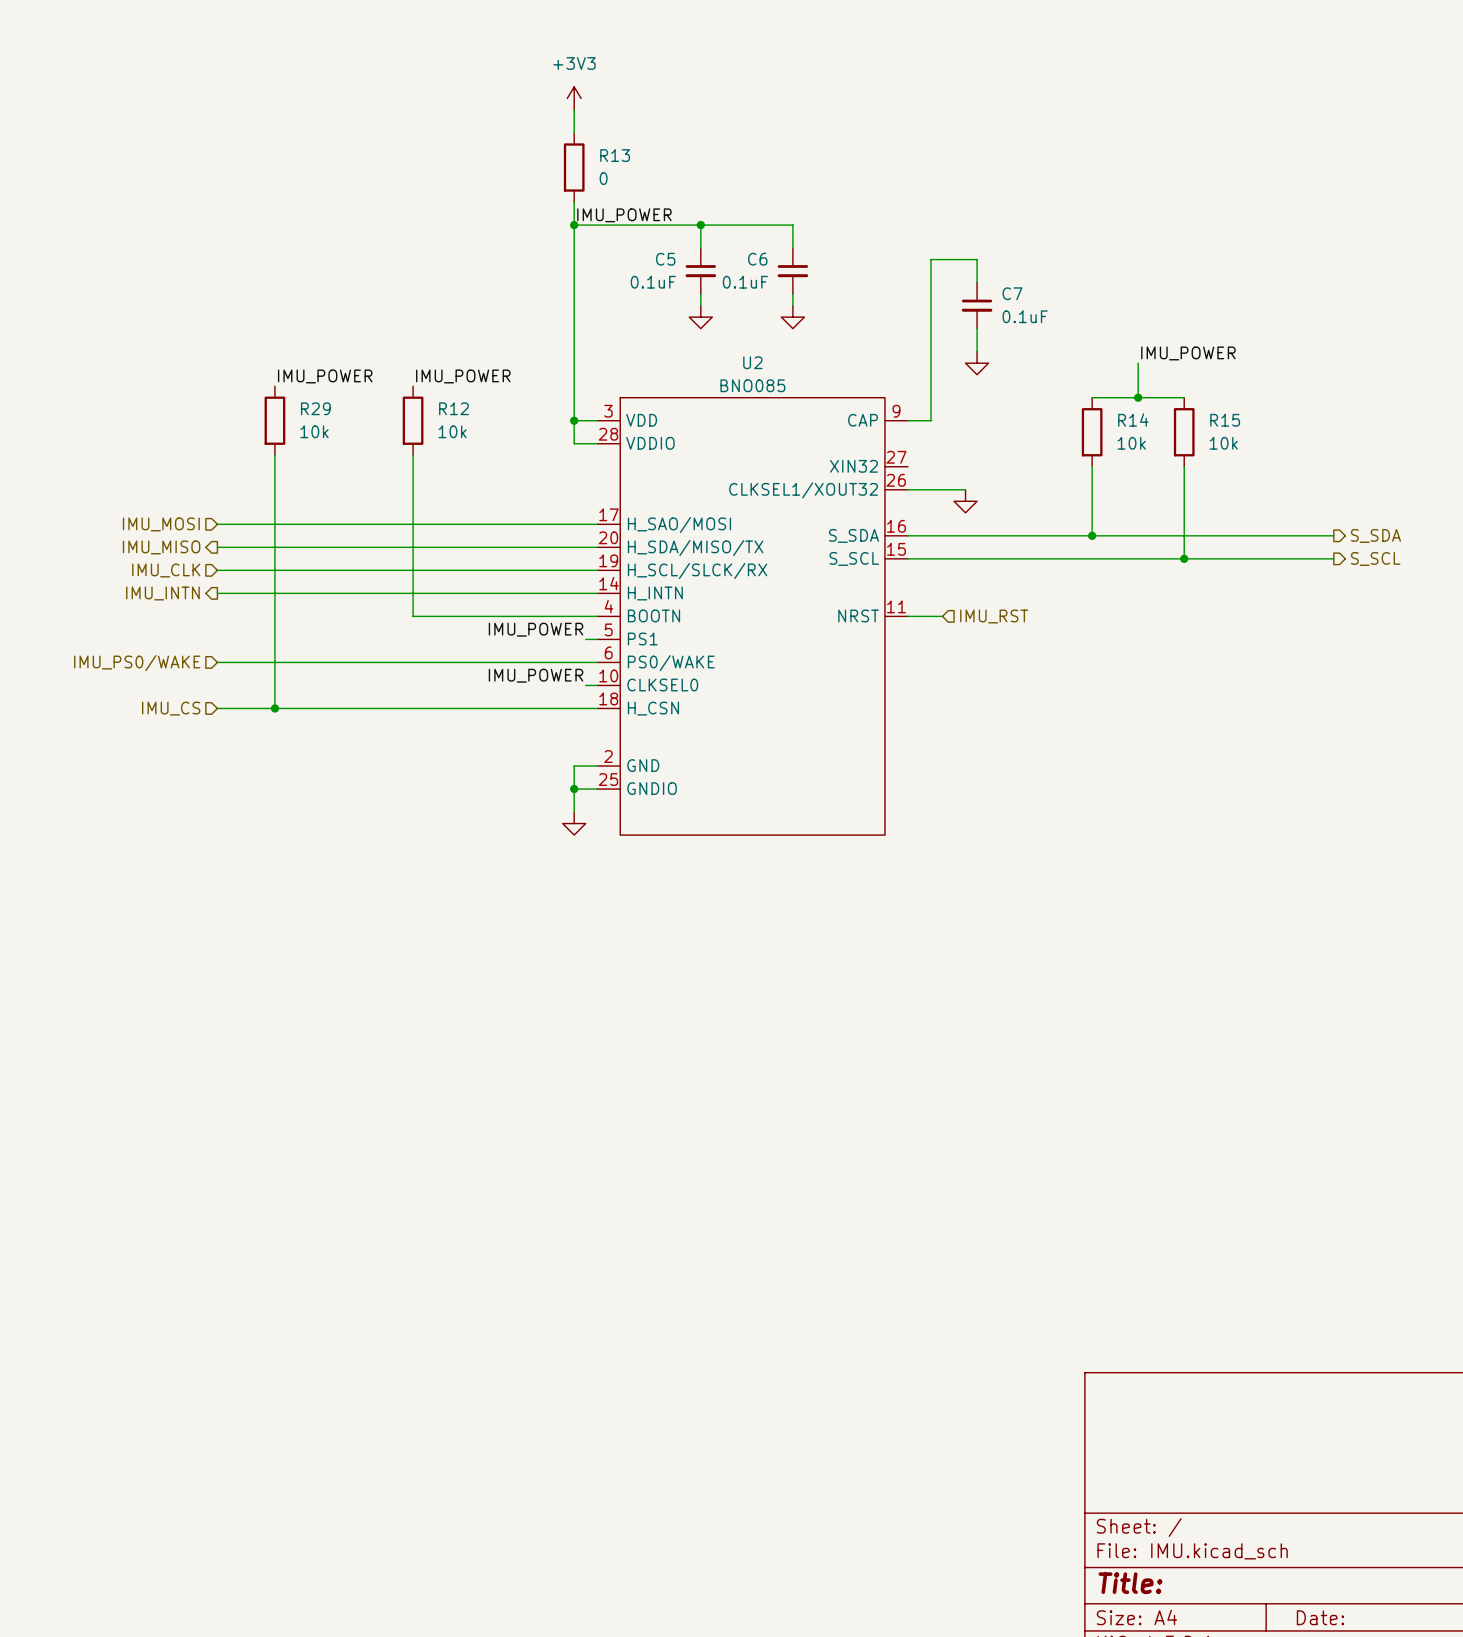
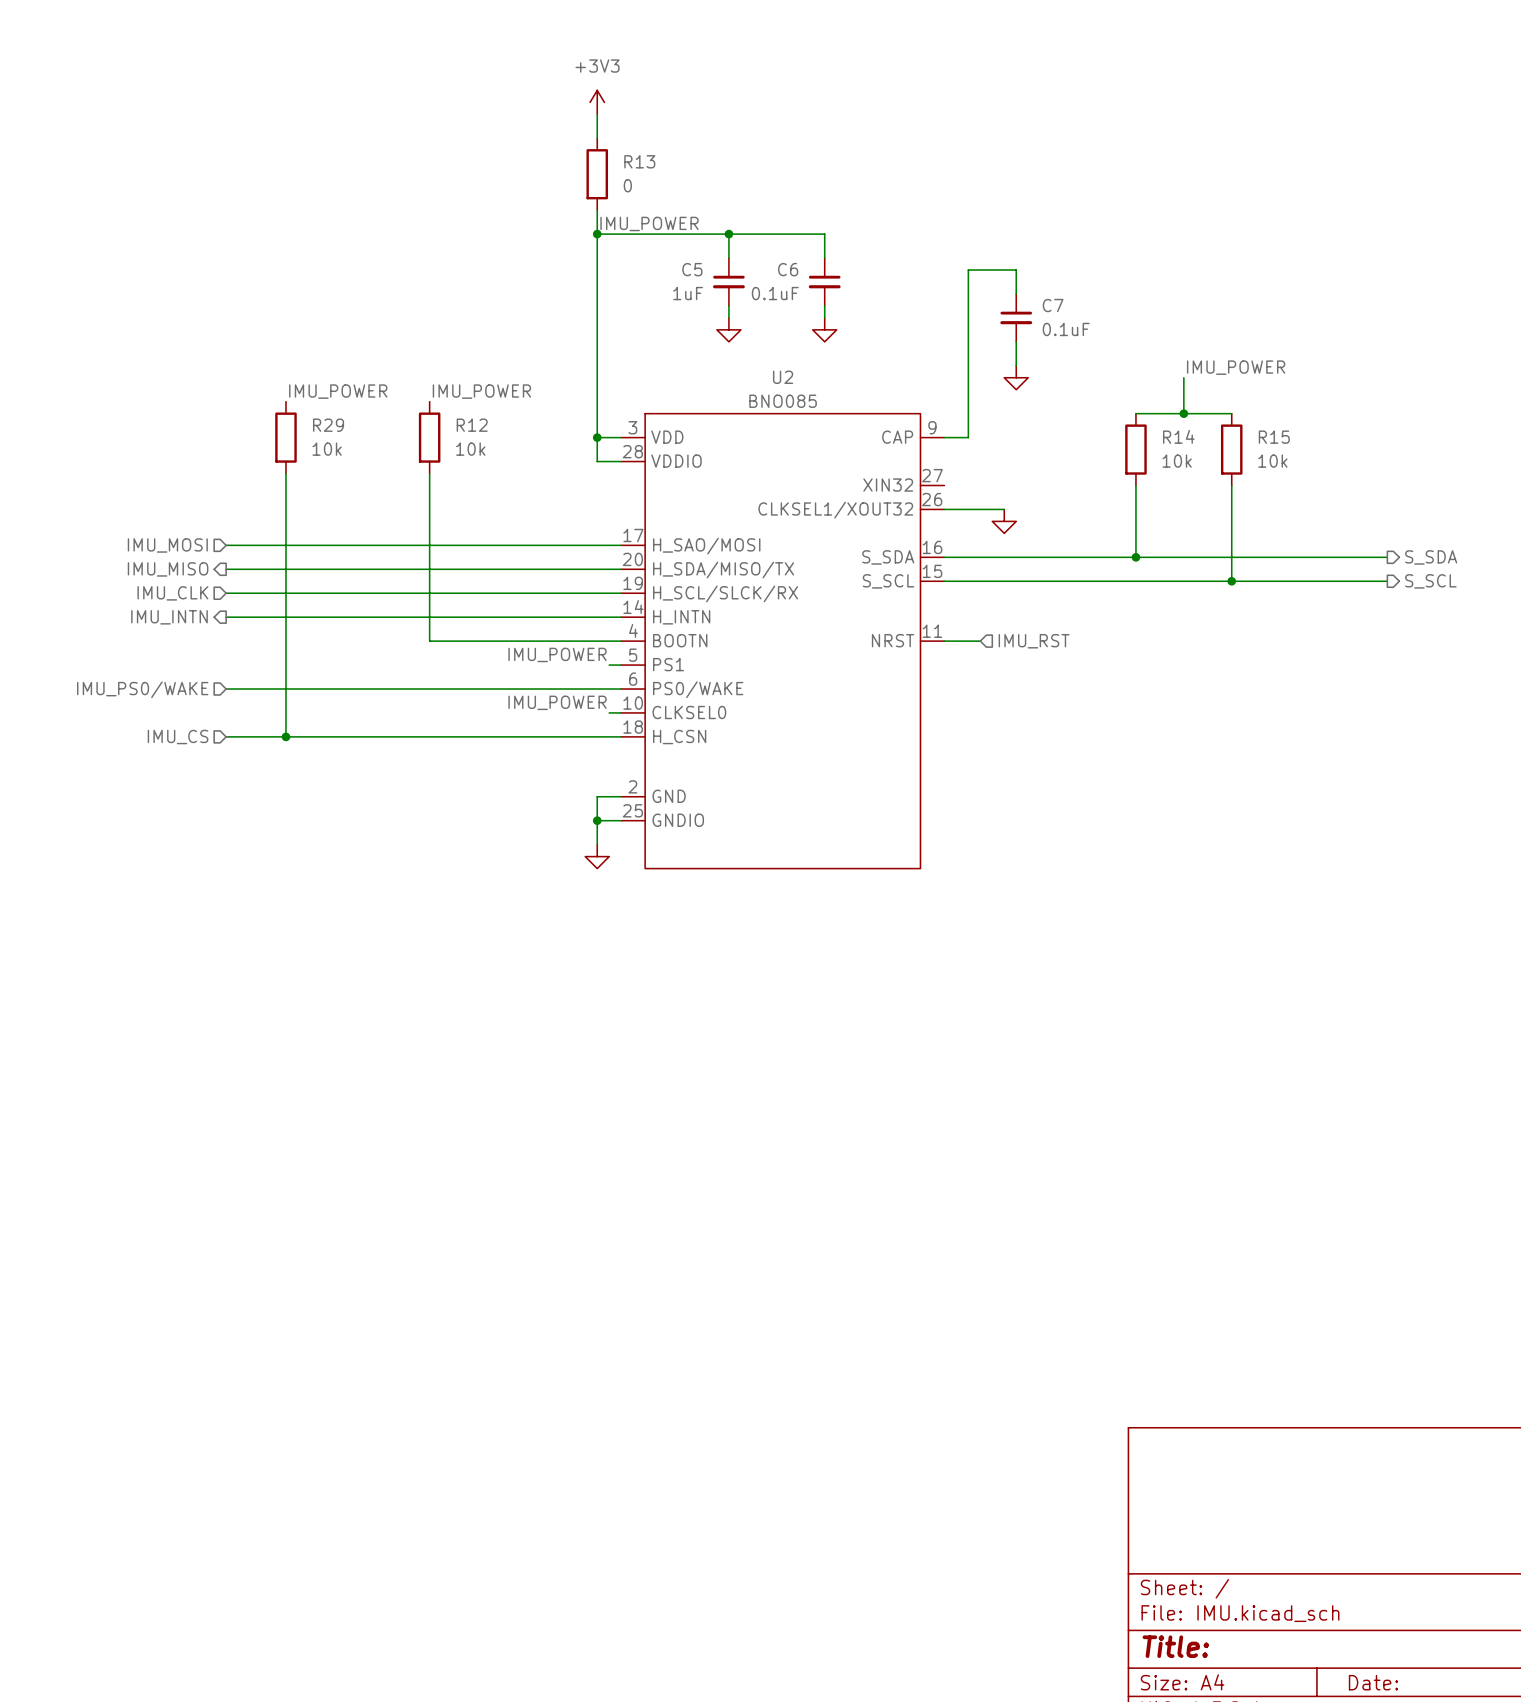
C5 value: 0.1uF (653, 282) -> 1uF (688, 293)

